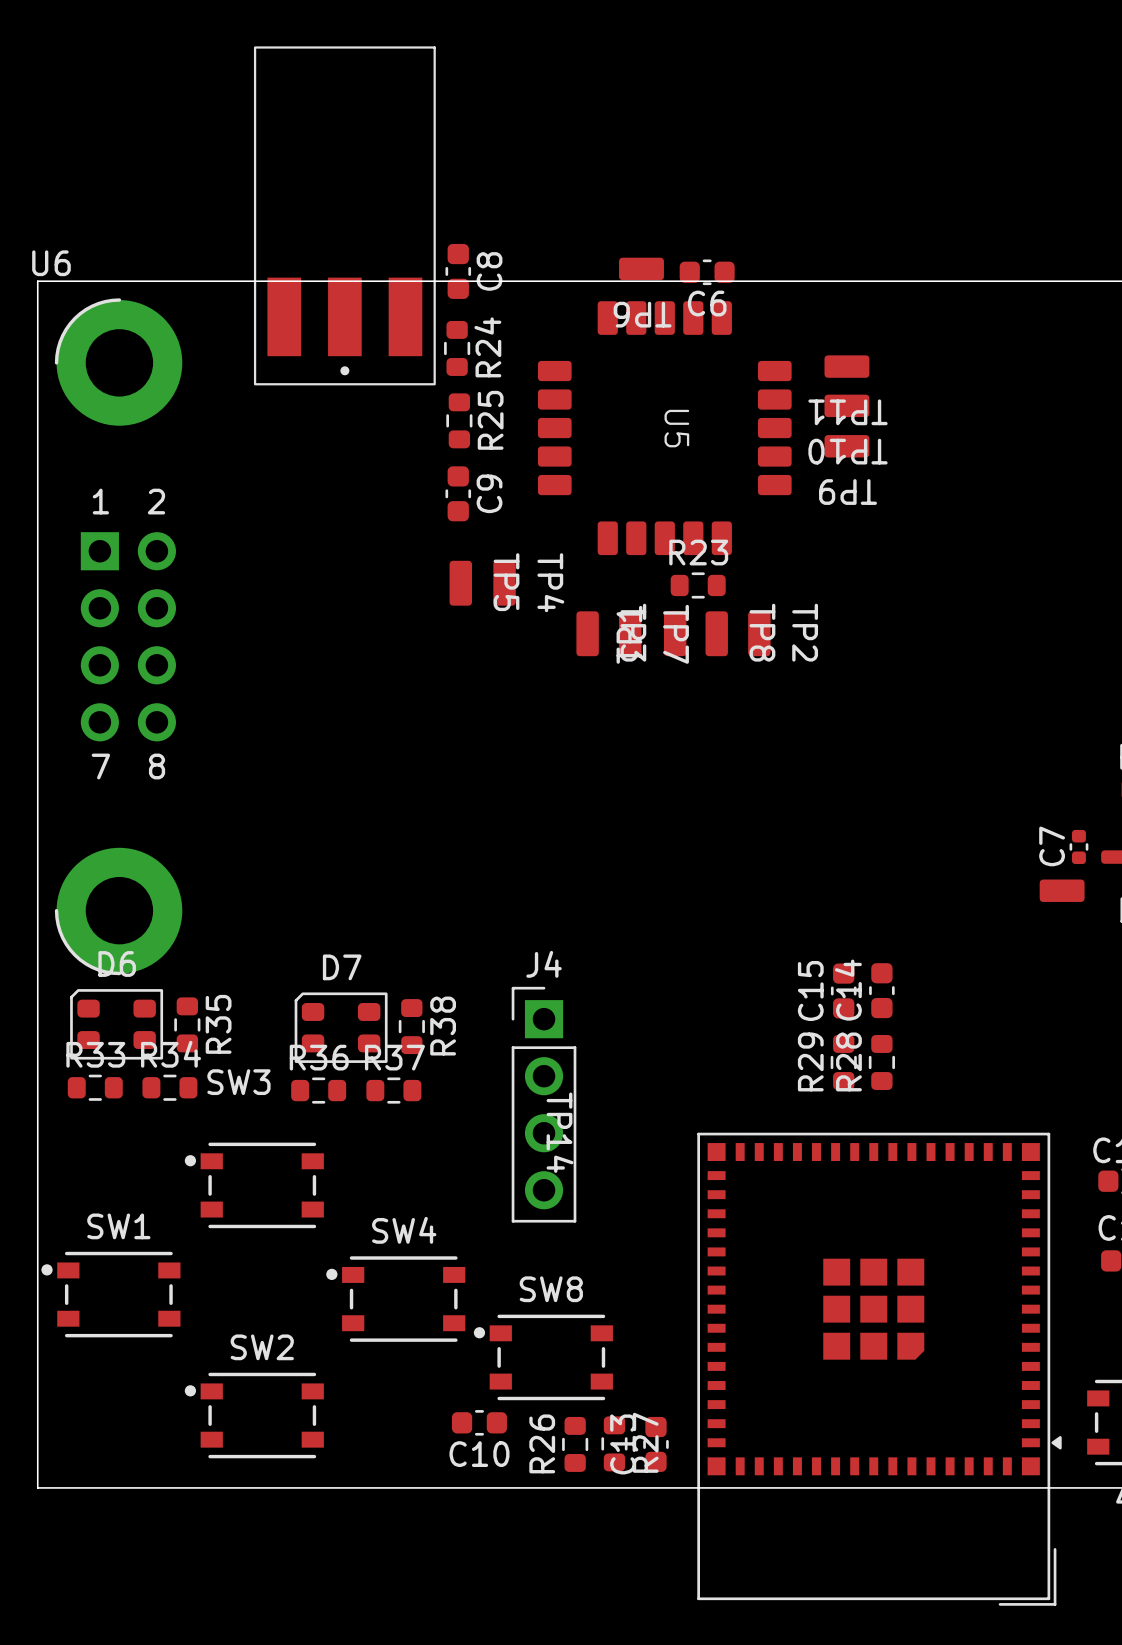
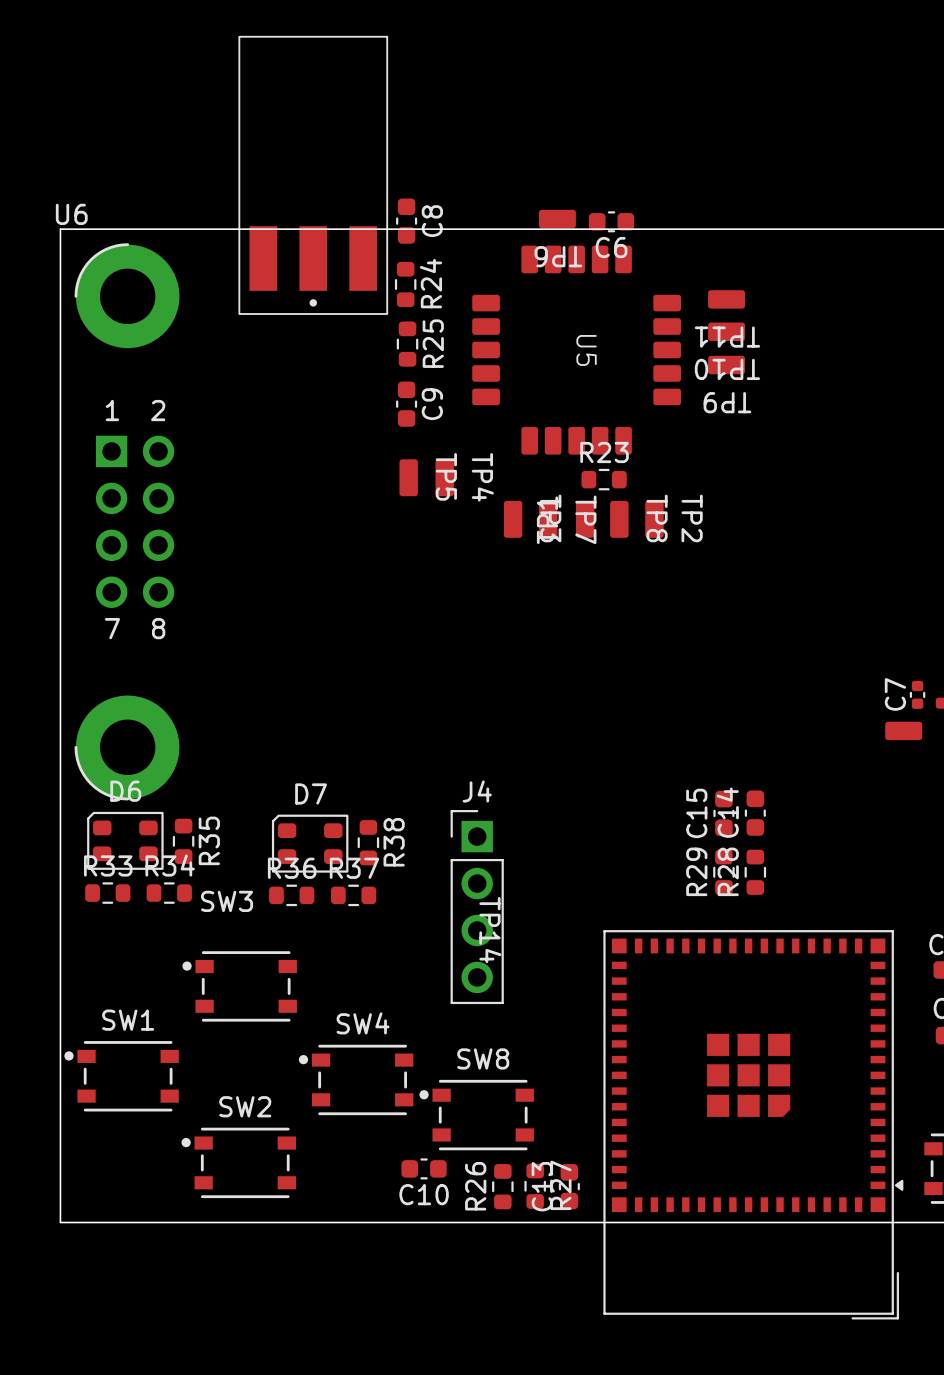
SW3 position: (254, 1185) -> (239, 986)
SW1 position: (110, 1294) -> (121, 1076)
SW4 position: (395, 1299) -> (356, 1079)

